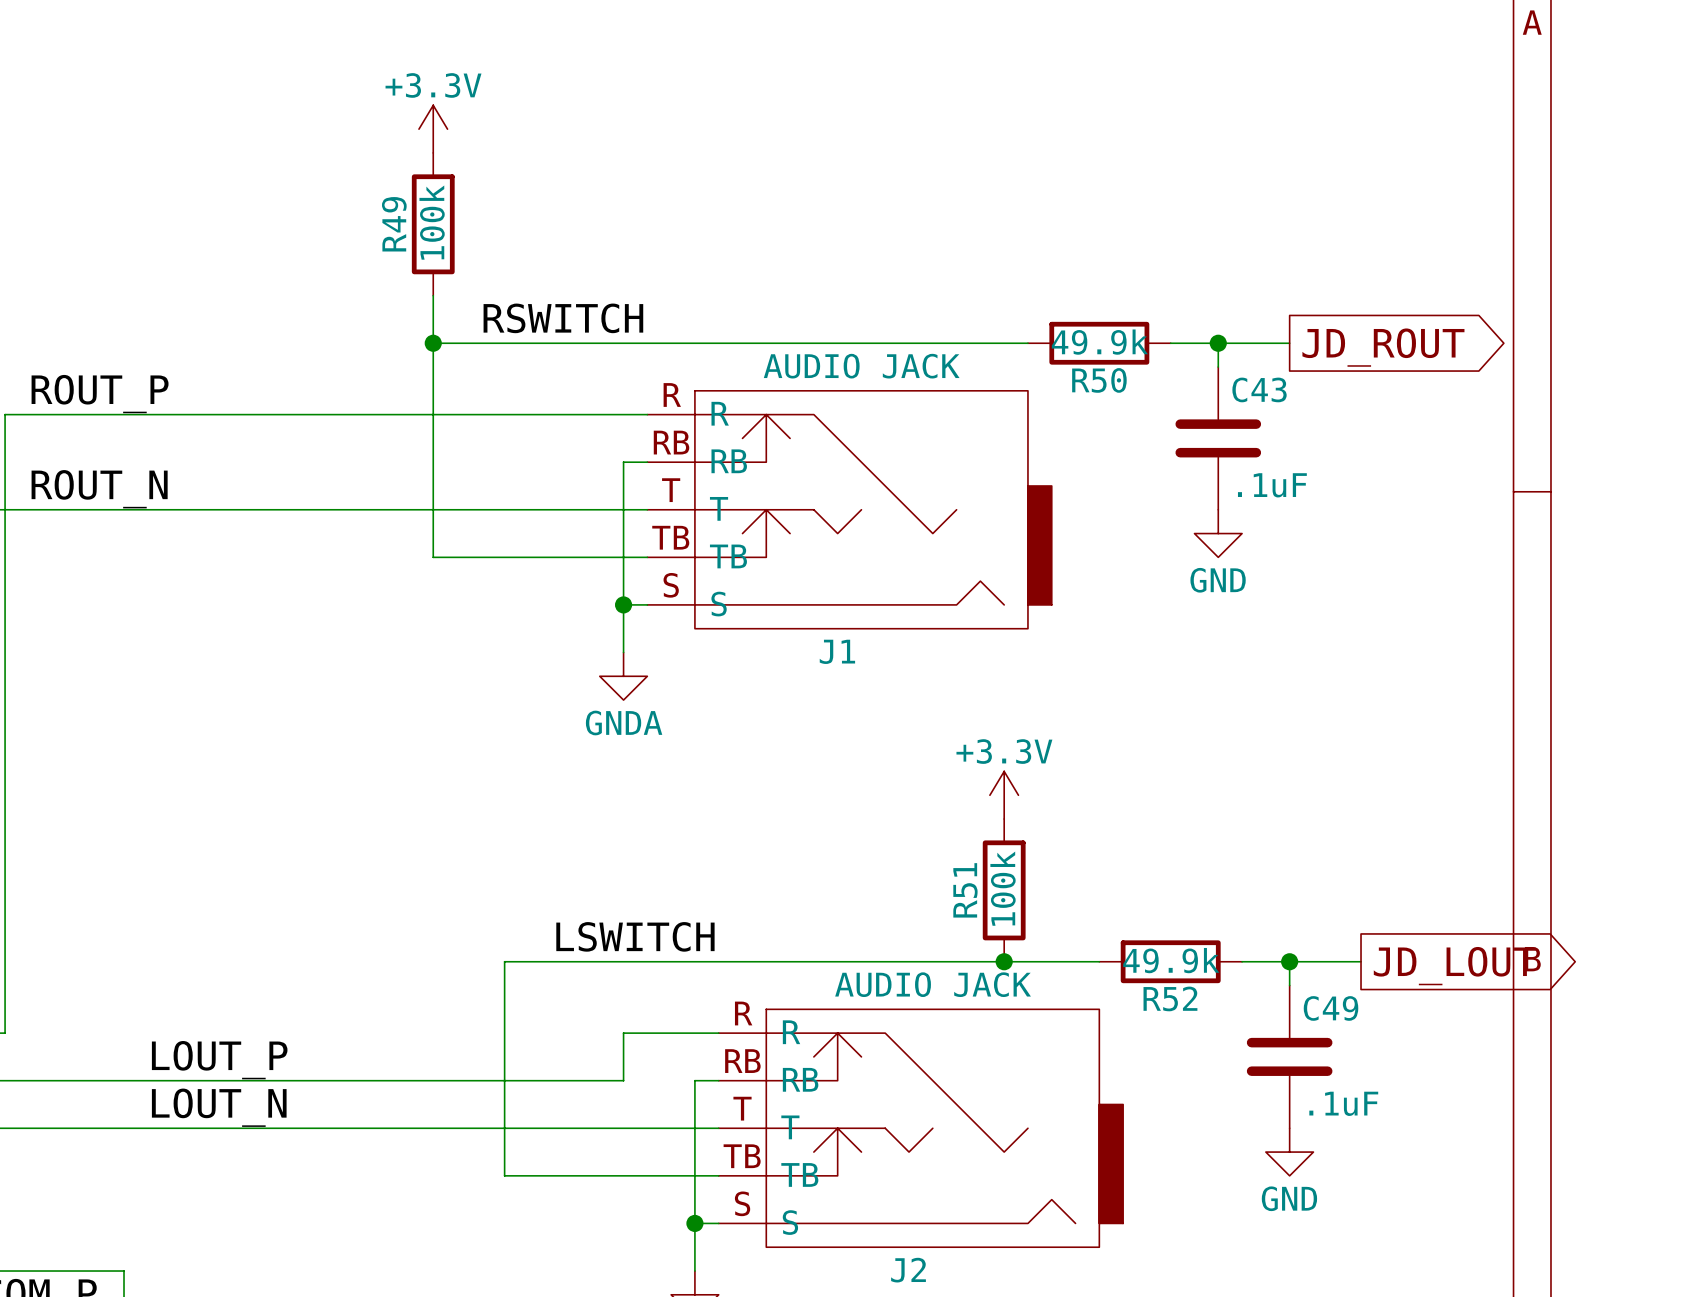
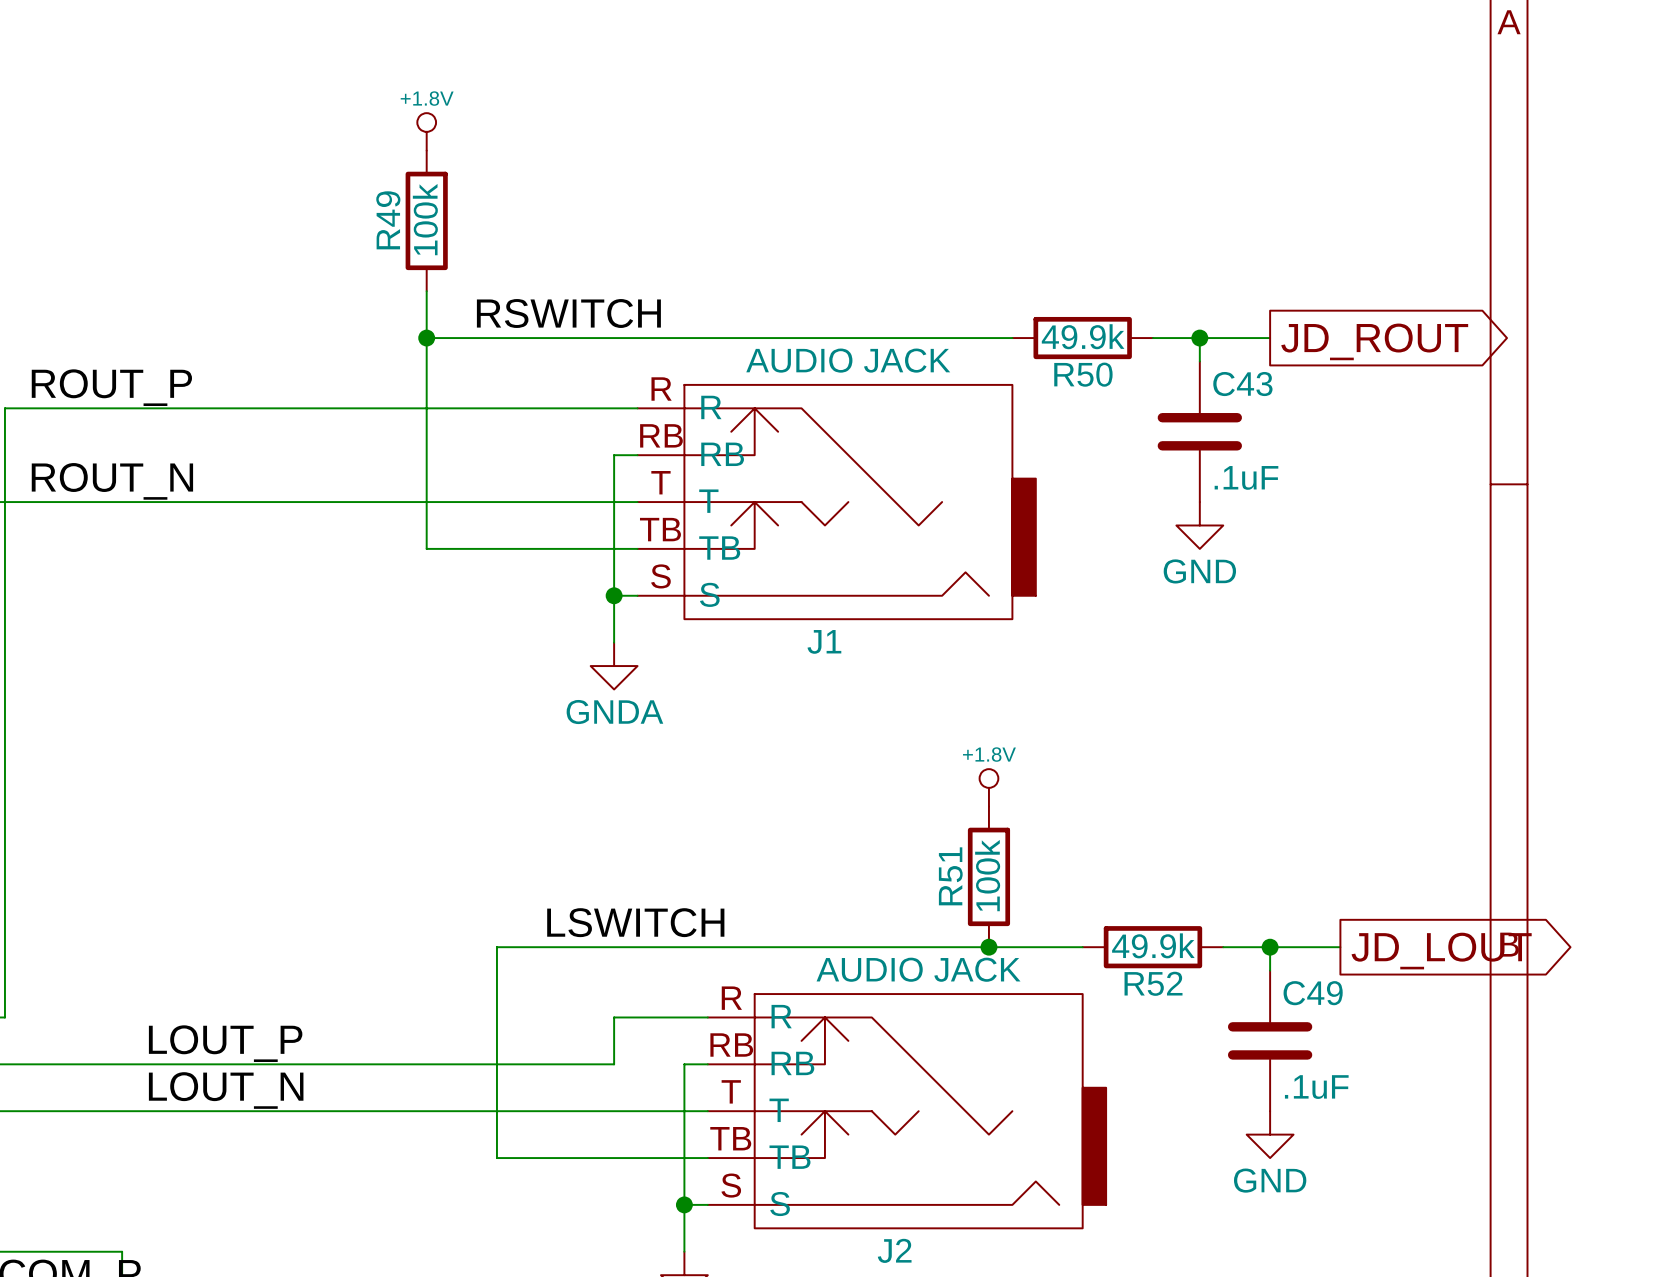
power symbol: +3.3V (433, 129) -> +1.8V (426, 131)
power symbol: +3.3V (1004, 795) -> +1.8V (988, 787)

